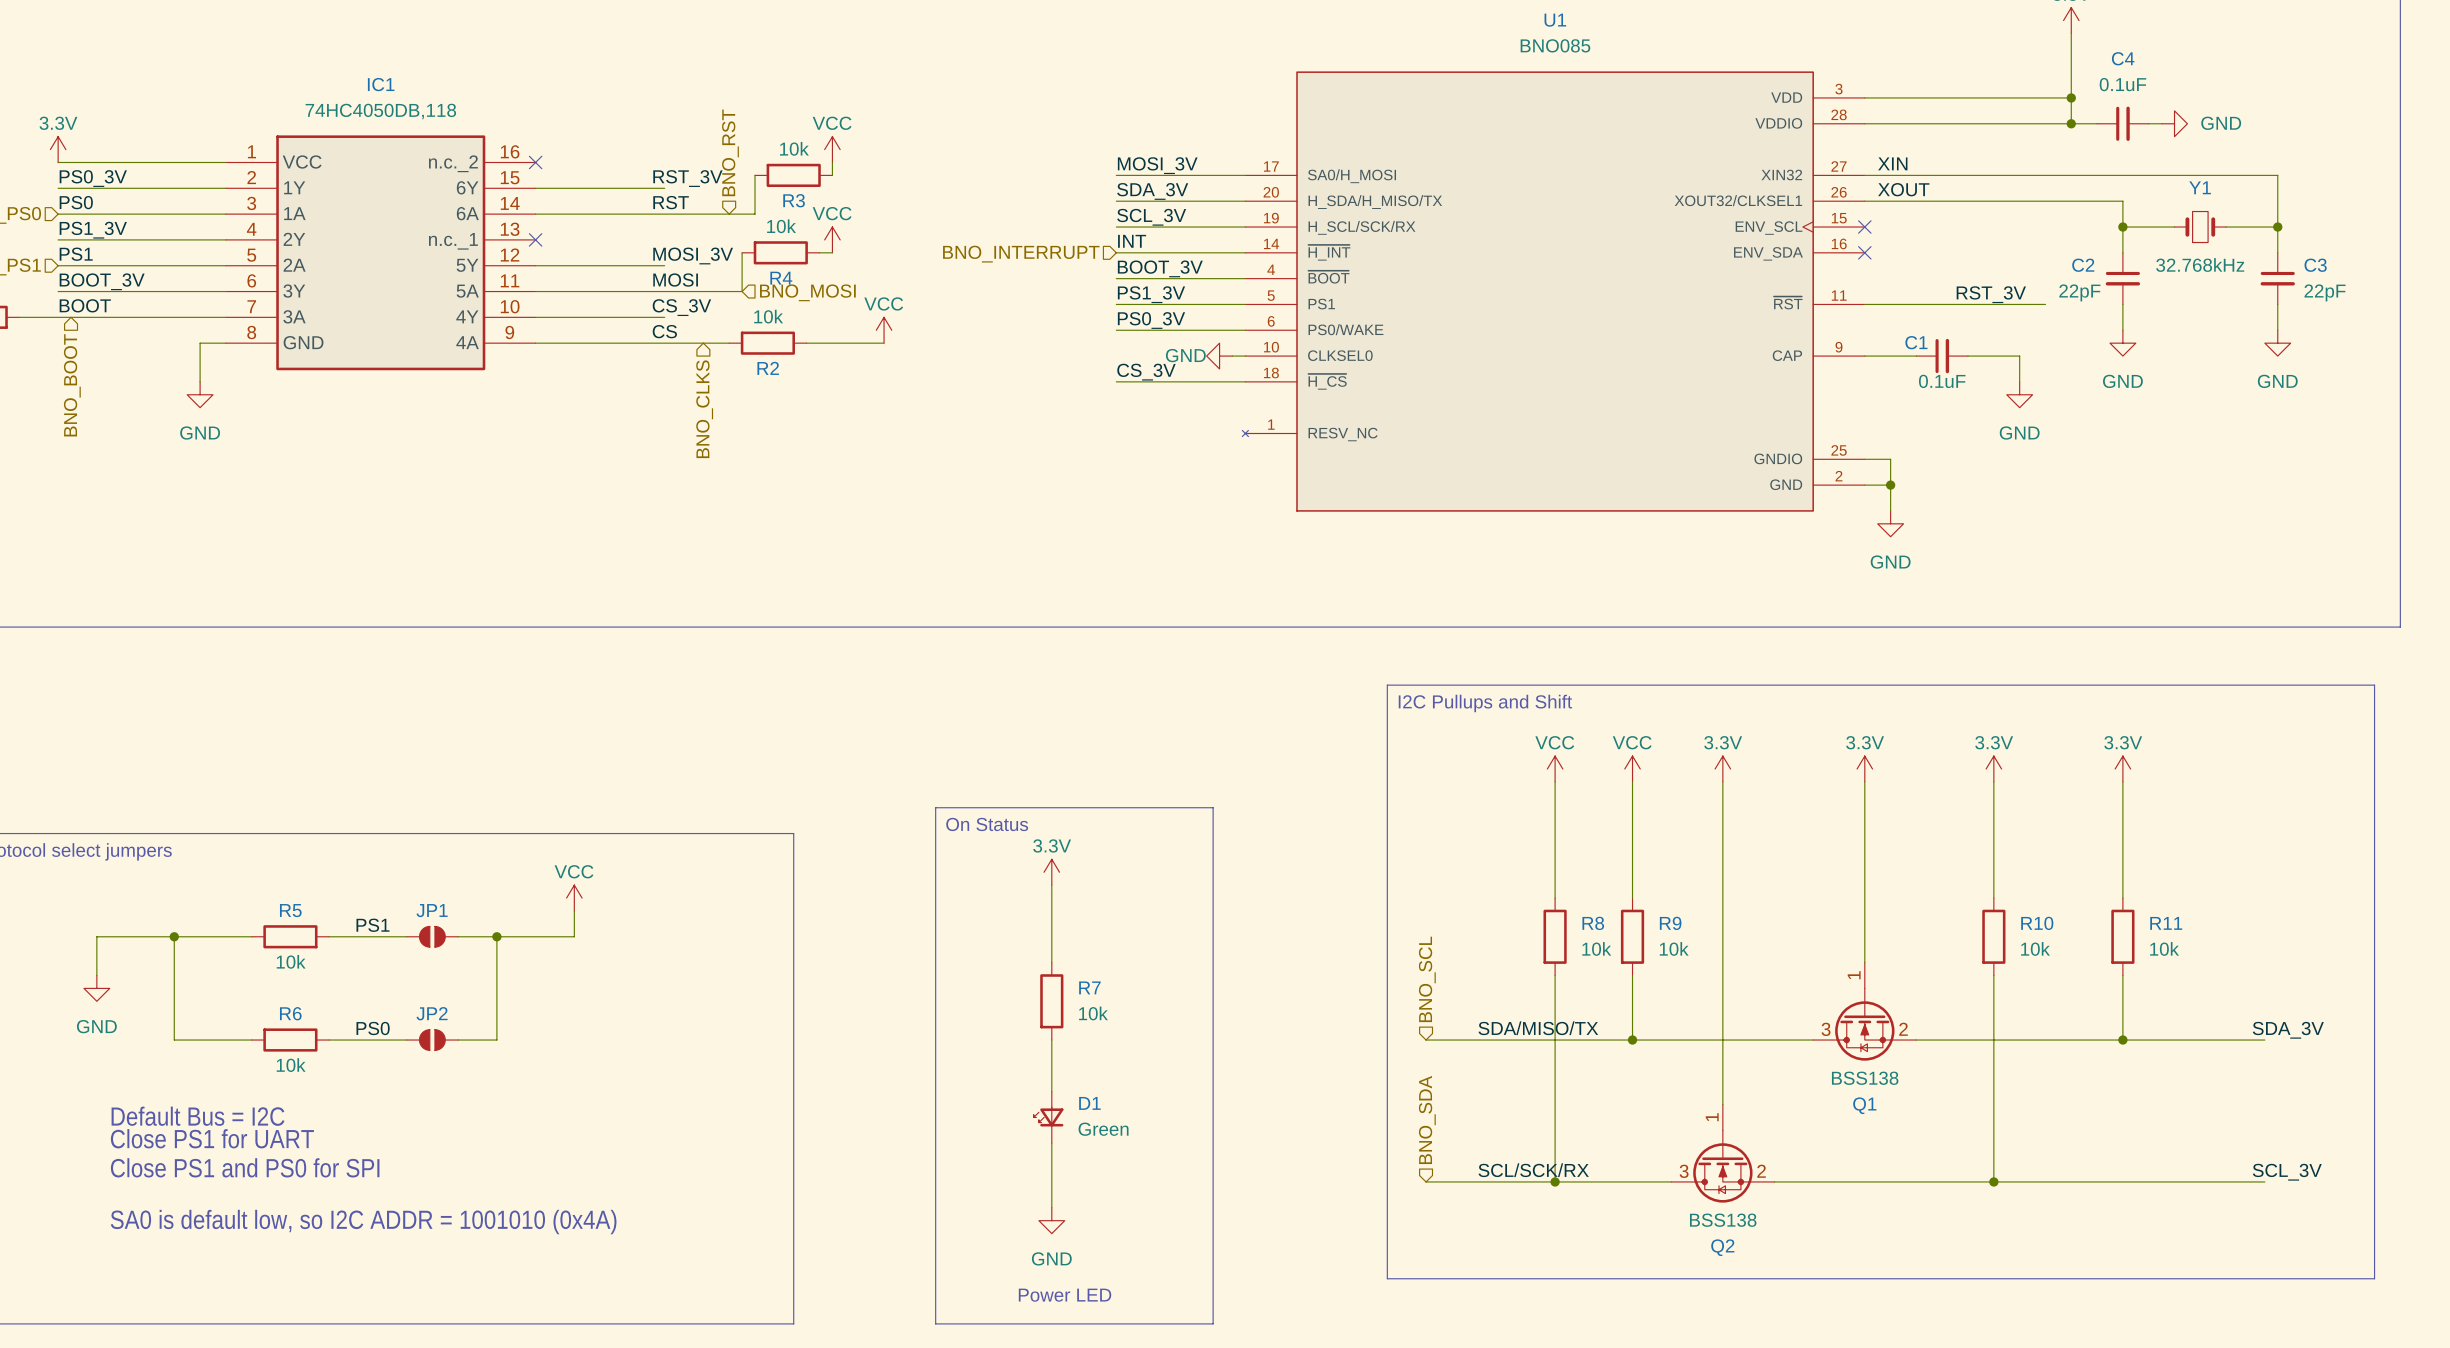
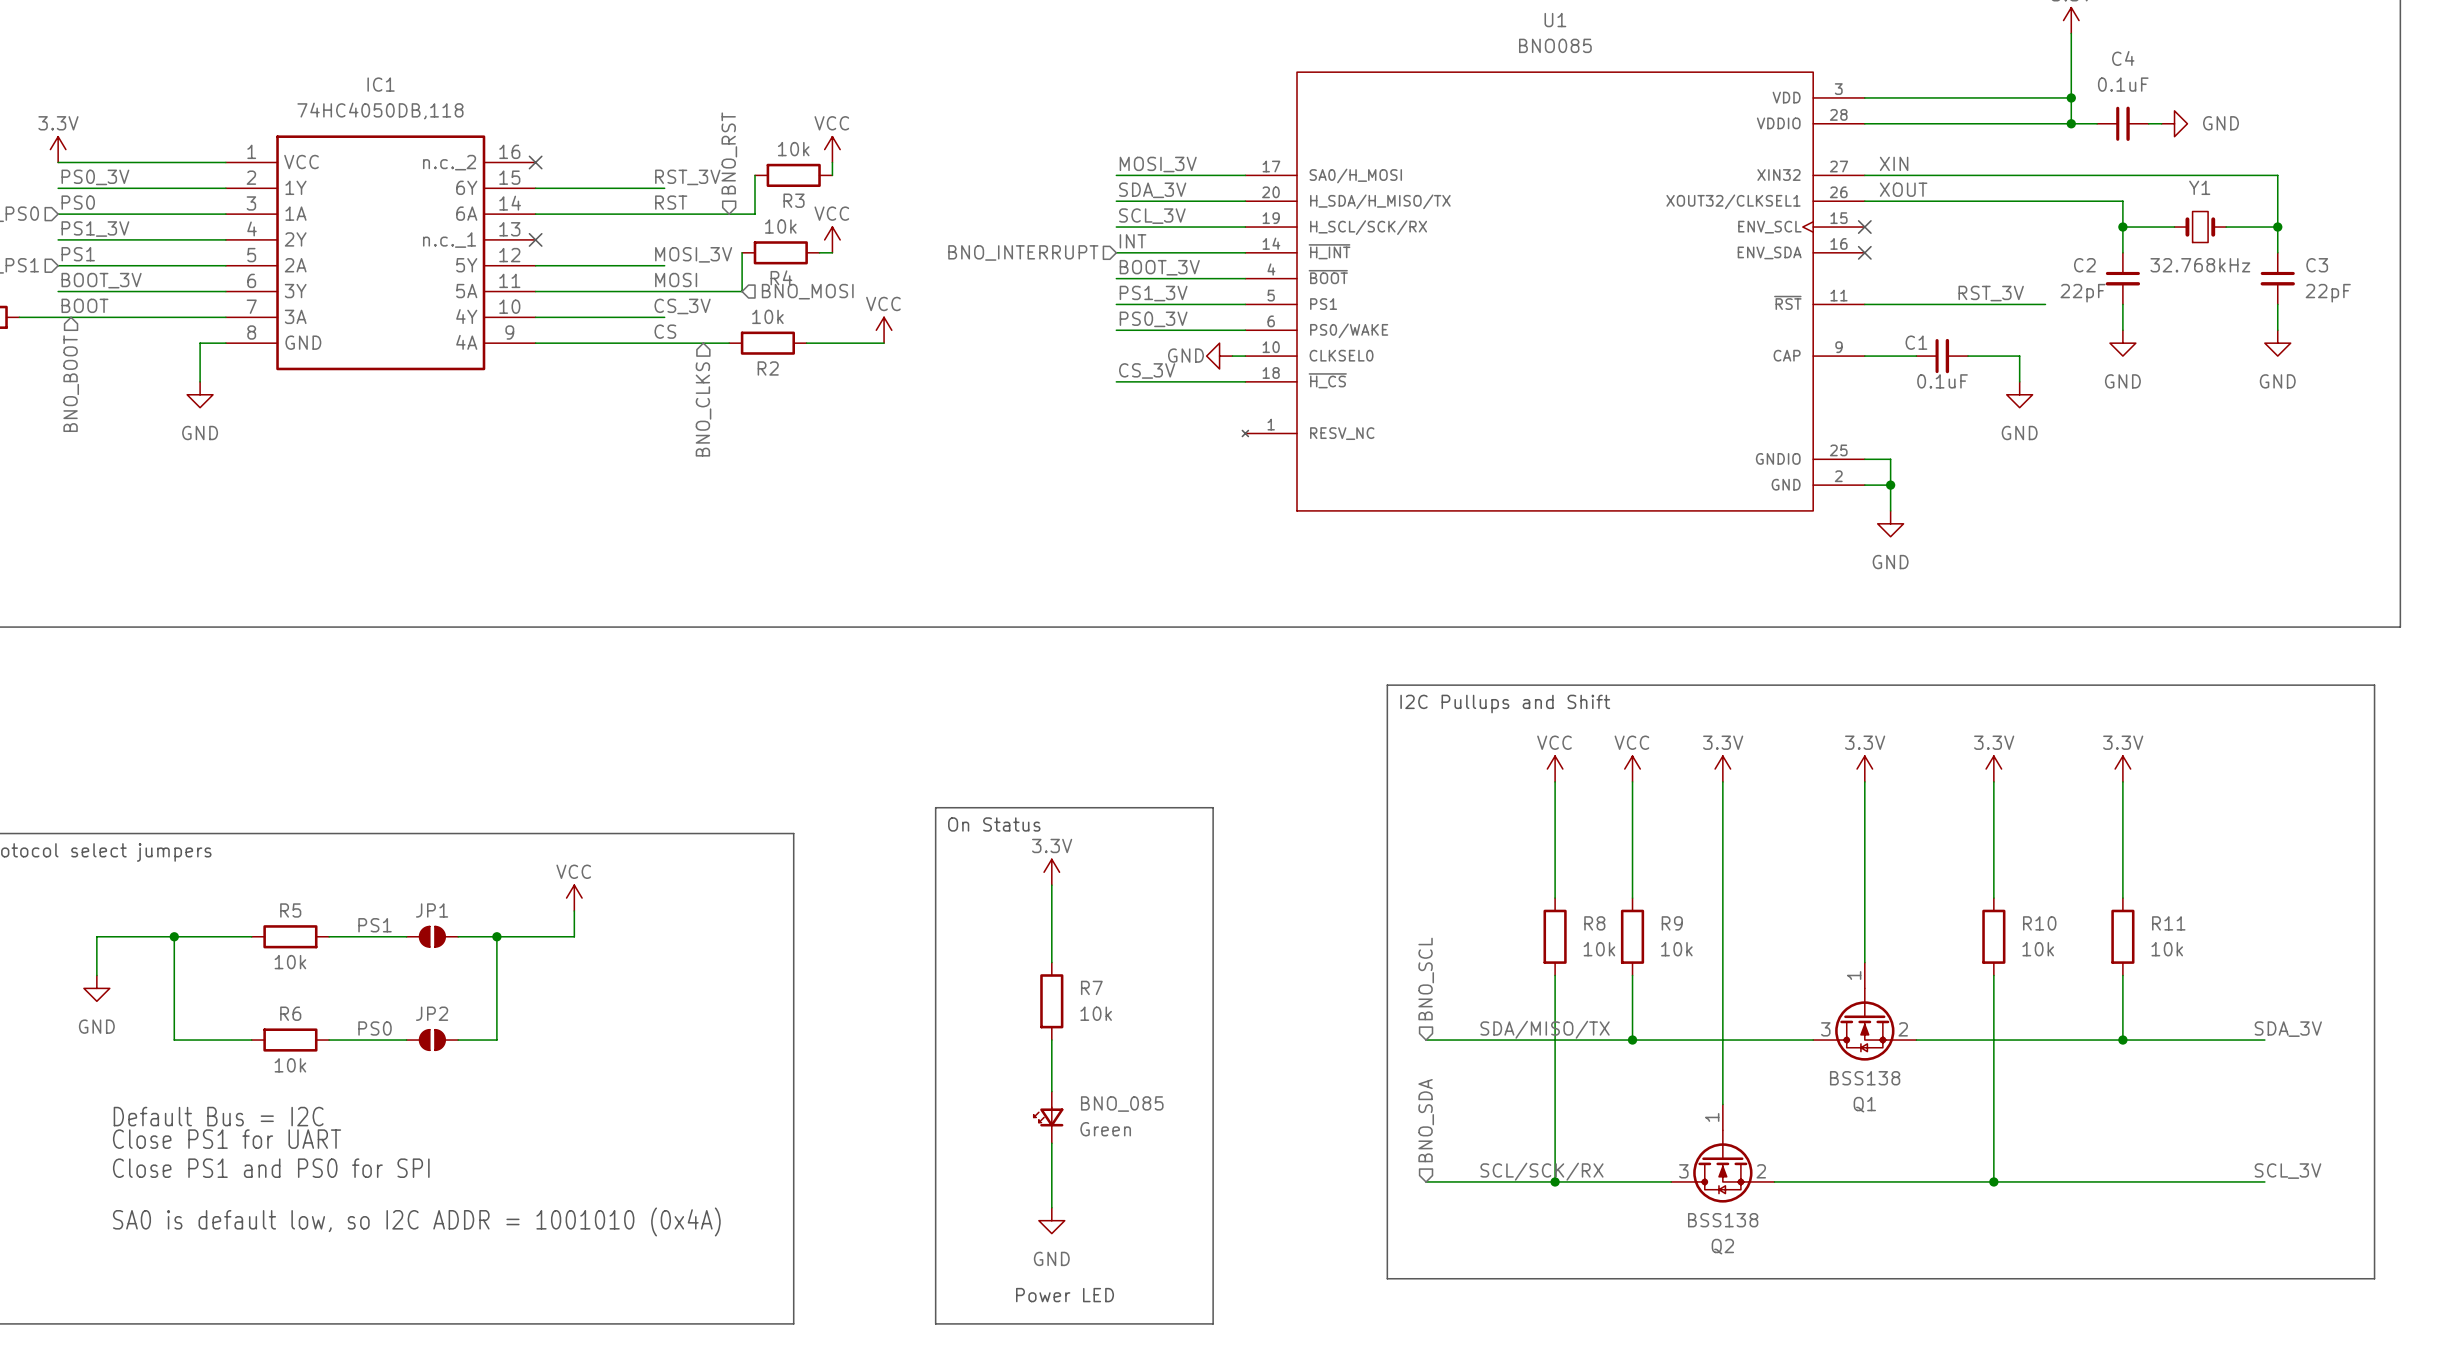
D1 name: D1 (1089, 1103) -> BNO_085 (1122, 1104)

